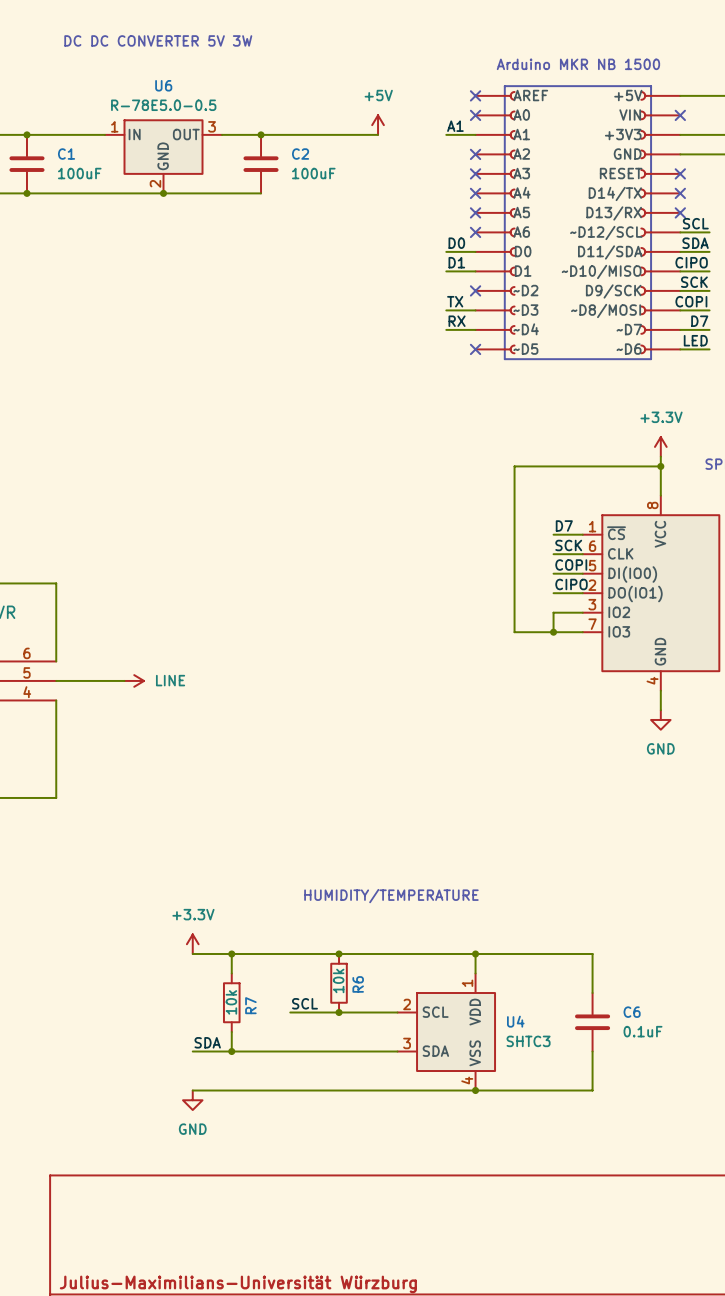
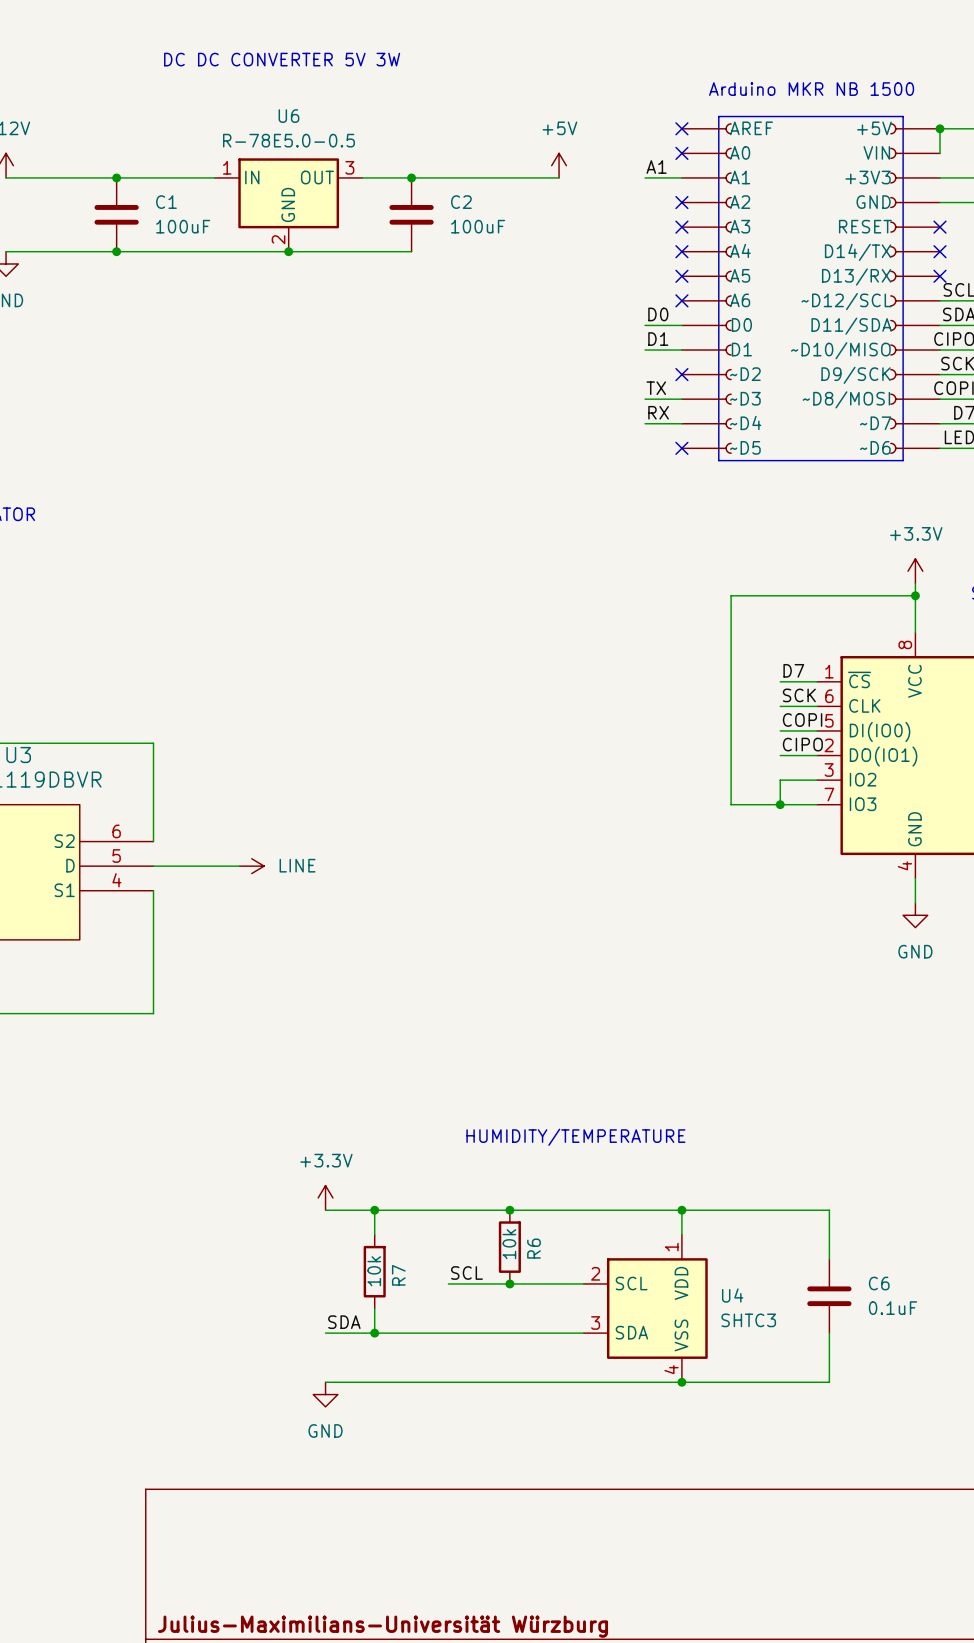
wire: none -> (939, 128) (939, 153)
junction: none -> (939, 128)
no-connect mark: (680, 115) -> none

